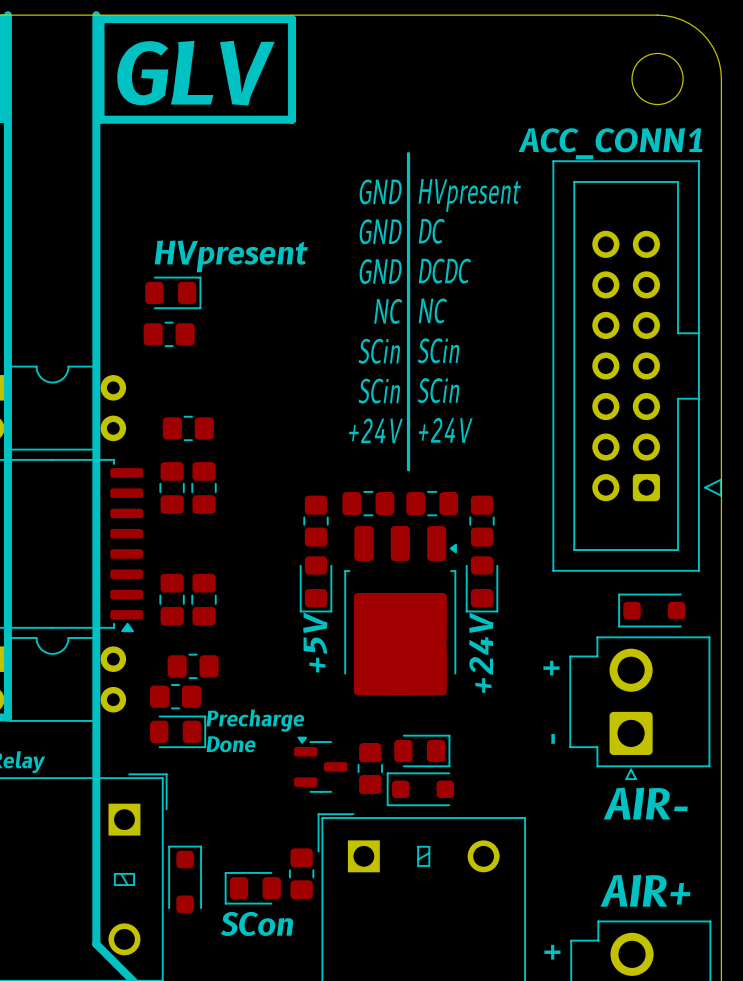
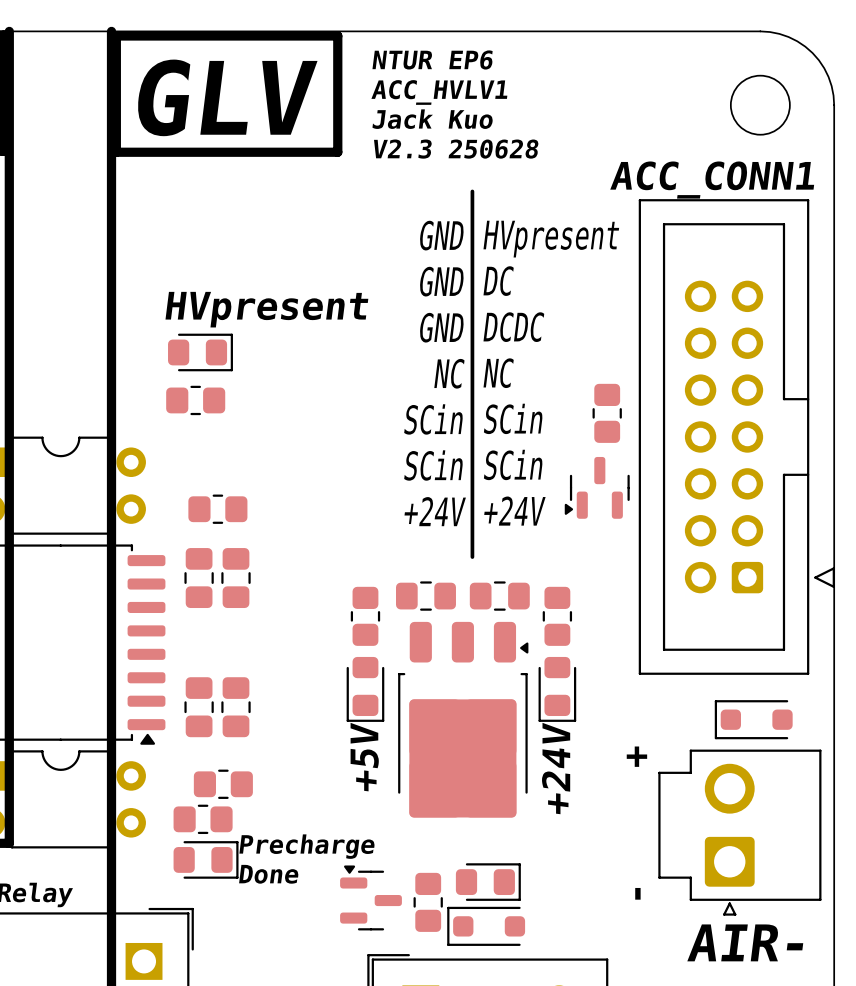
text: none -> NTUR EP6 (432, 59)
text: none -> ACC_HVLV1 (439, 92)
text: none -> Jack Kuo (432, 119)
text: none -> V2.3 250628 (456, 149)
part: none -> (607, 413)
part: none -> (597, 487)

